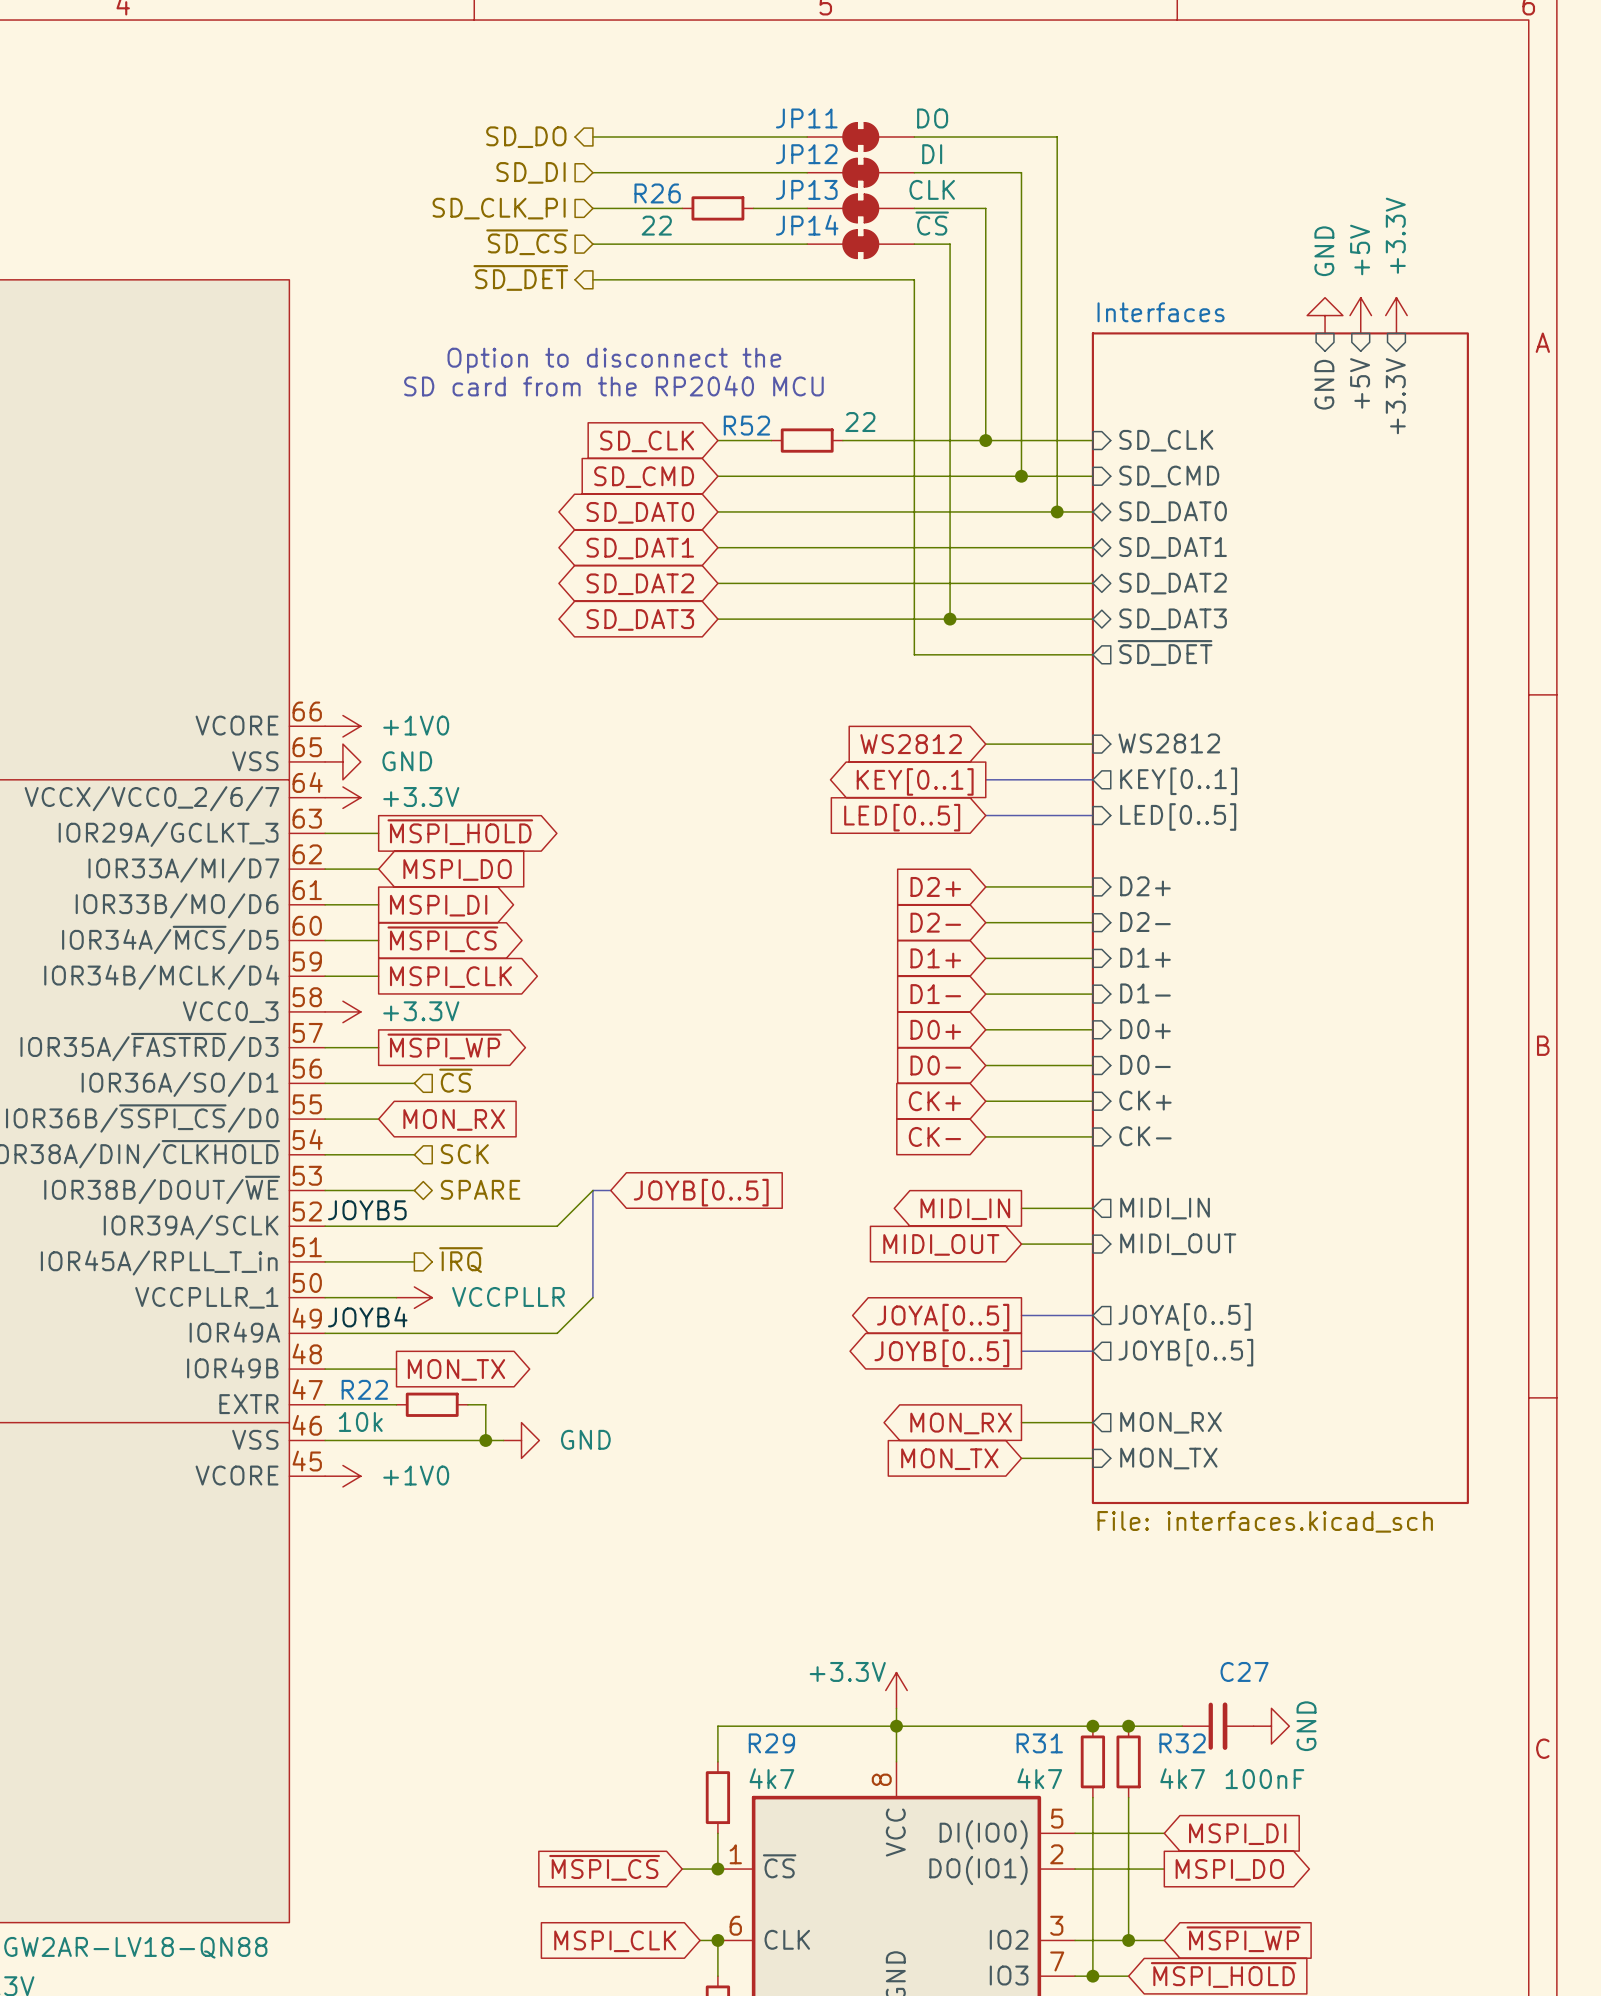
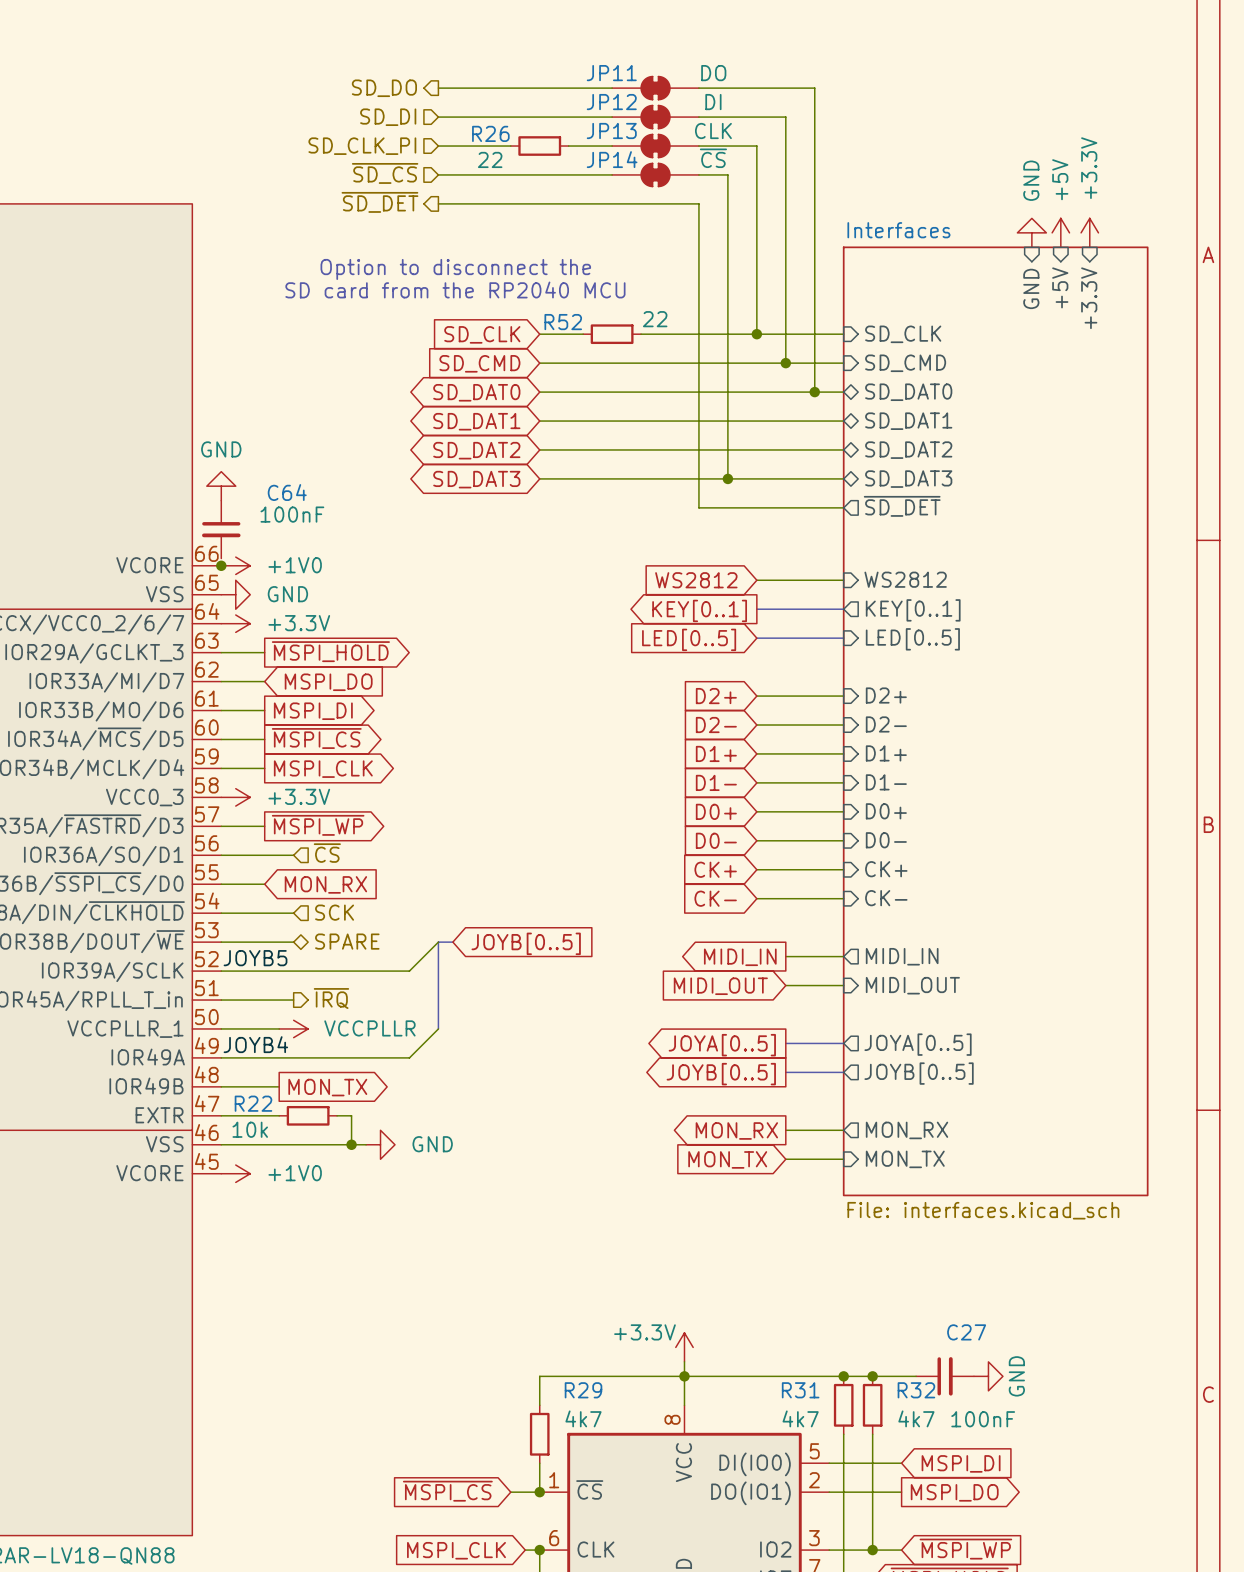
power symbol: none -> GND (221, 486)
C64: none -> 100nF (221, 529)
junction: none -> (221, 565)

